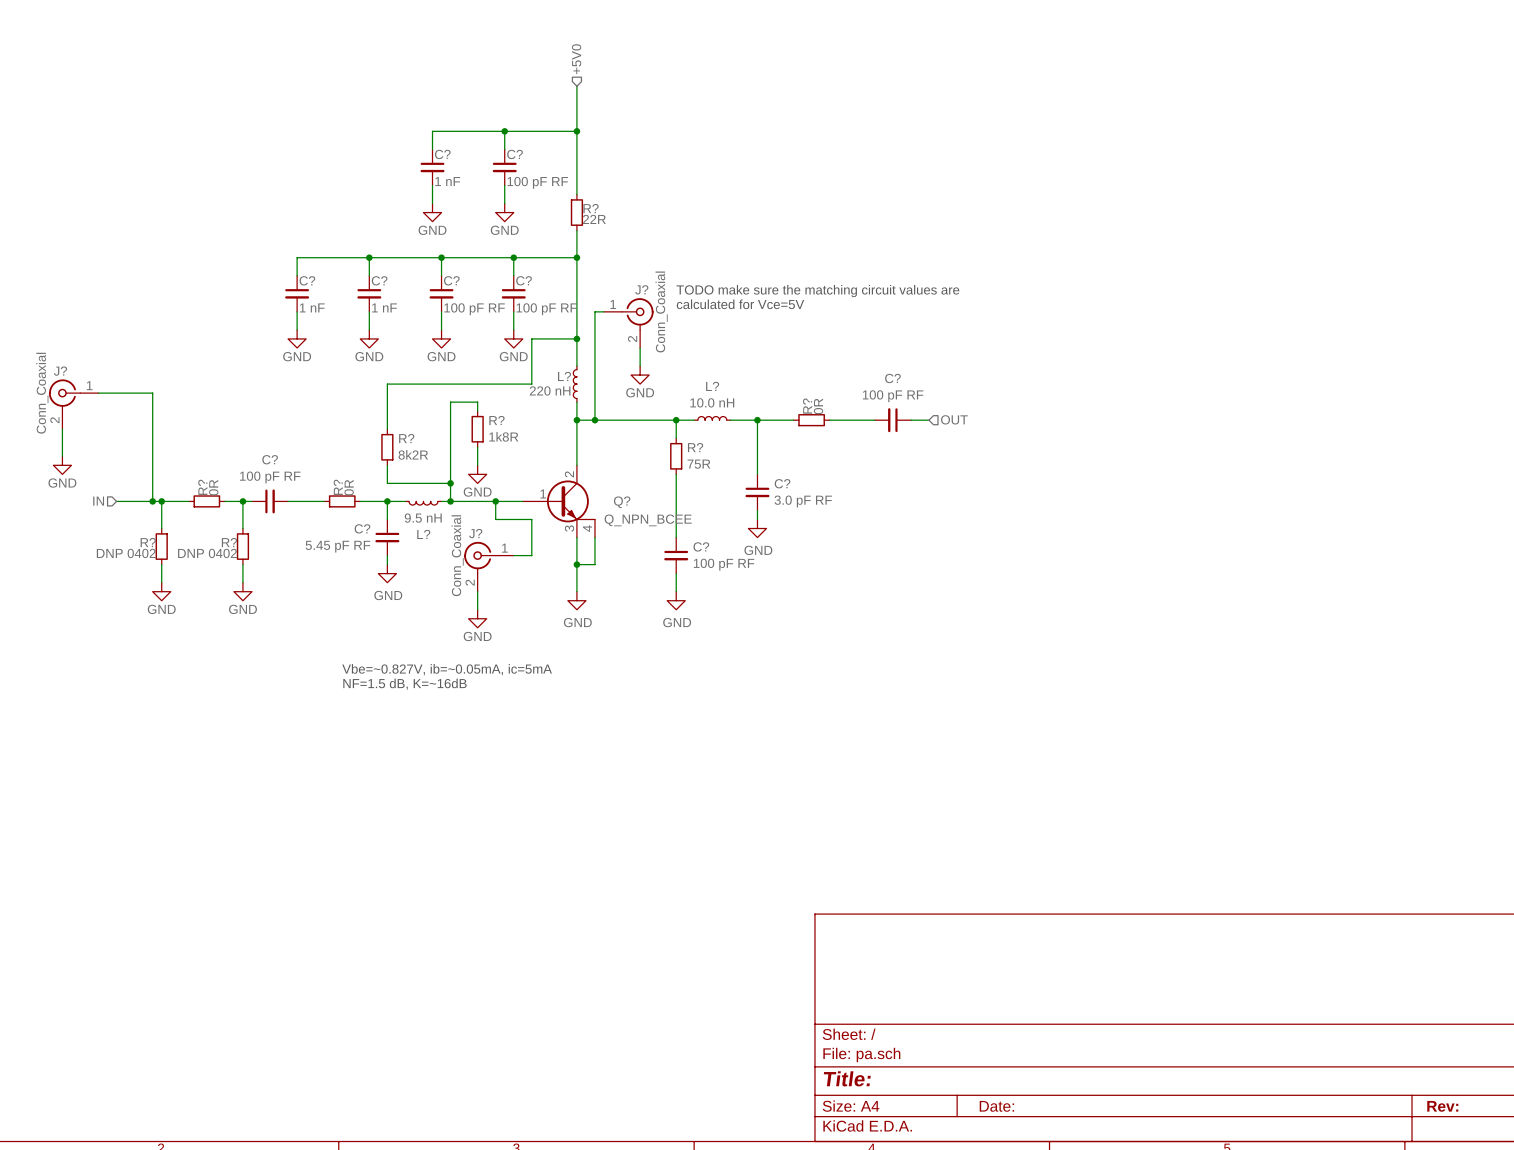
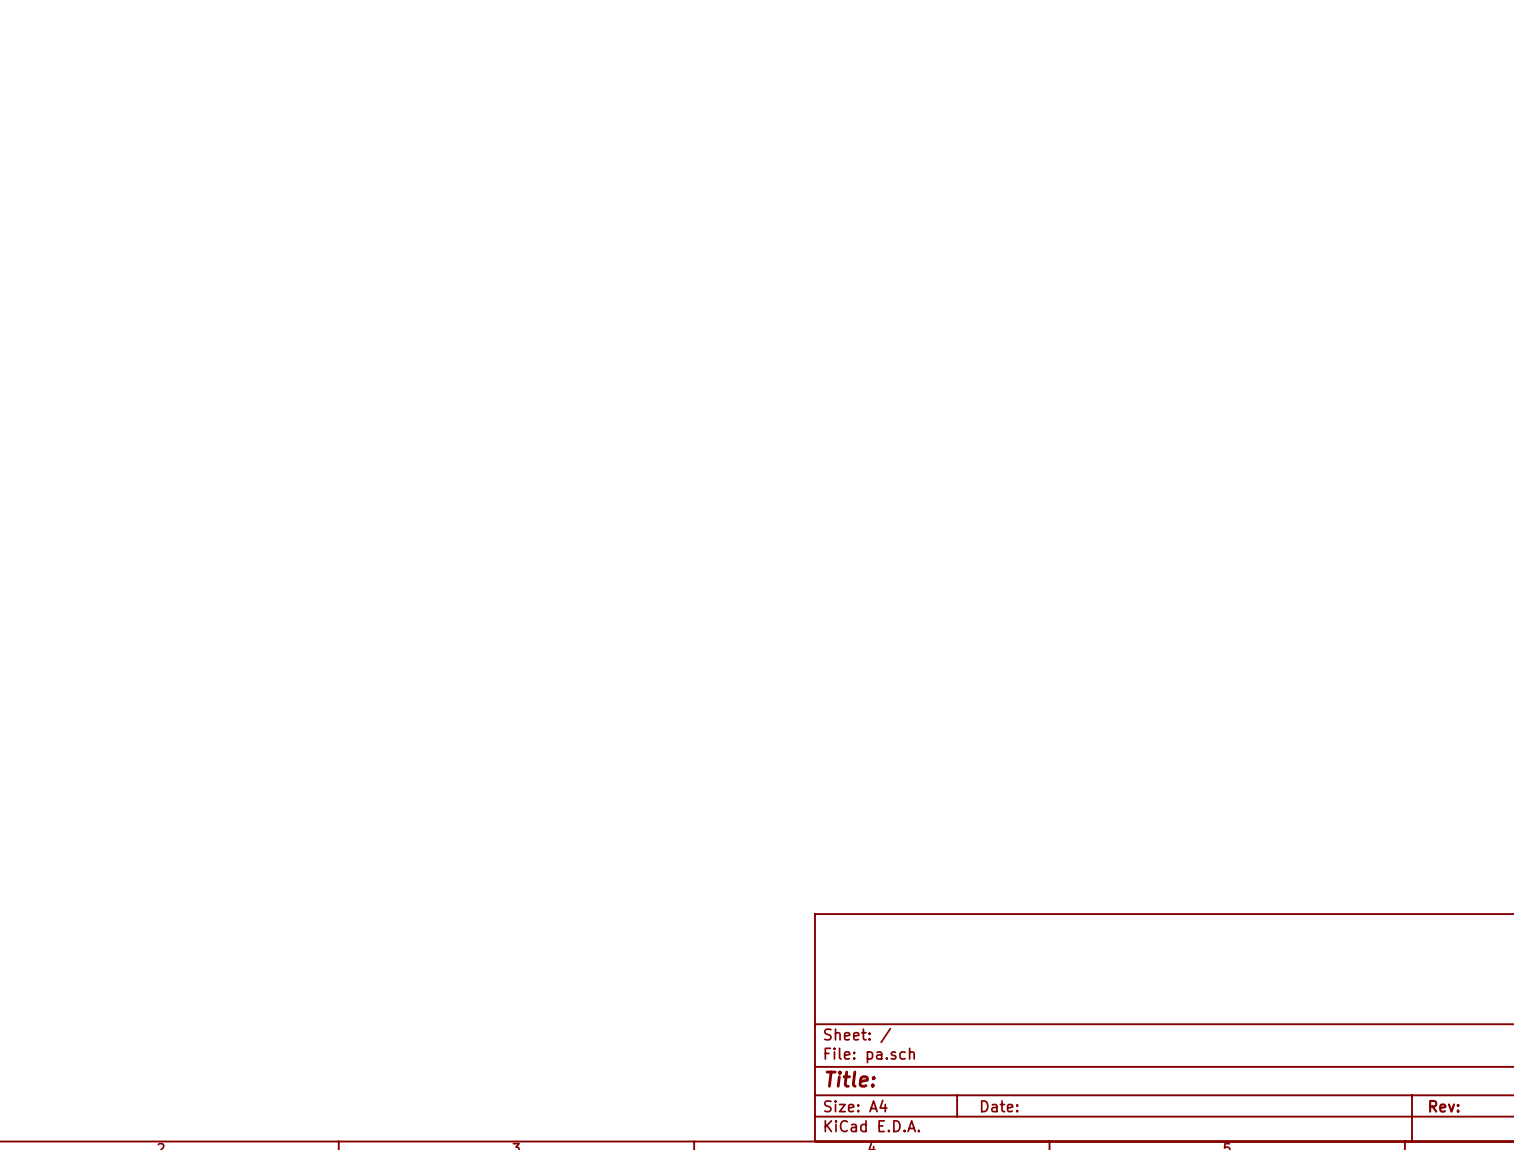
hierarchical label: +5V0 (576, 59) -> none
wire: (576, 86) (576, 194) -> none
wire: (504, 131) (504, 149) -> none
junction: (504, 131) -> none
wire: (576, 131) (432, 131) (432, 149) -> none
junction: (576, 131) -> none
C?: 1 nF (432, 167) -> none
C?: 100 pF RF (504, 167) -> none
wire: (432, 185) (432, 203) -> none
wire: (504, 185) (504, 203) -> none
power symbol: GND (432, 212) -> none
power symbol: GND (504, 212) -> none
R?: 22R (576, 212) -> none
wire: (576, 230) (576, 366) -> none
wire: (369, 257) (369, 275) -> none
junction: (369, 257) -> none
wire: (441, 257) (441, 275) -> none
junction: (441, 257) -> none
wire: (513, 257) (513, 275) -> none
junction: (513, 257) -> none
wire: (576, 257) (297, 257) (297, 275) -> none
junction: (576, 257) -> none
text: TODO make sure the matching circuit values are (817, 291) -> none
C?: 1 nF (297, 293) -> none
C?: 1 nF (369, 293) -> none
C?: 100 pF RF (441, 293) -> none
C?: 100 pF RF (513, 293) -> none
text: calculated for Vce=5V (740, 304) -> none
wire: (297, 311) (297, 329) -> none
wire: (369, 311) (369, 329) -> none
wire: (441, 311) (441, 329) -> none
wire: (513, 311) (513, 329) -> none
wire: (604, 311) (594, 311) (594, 420) -> none
J?: Conn_Coaxial (628, 323) -> none
power symbol: GND (297, 338) -> none
power symbol: GND (369, 338) -> none
power symbol: GND (441, 338) -> none
power symbol: GND (513, 338) -> none
wire: (576, 338) (531, 338) (531, 384) (387, 384) (387, 429) -> none
junction: (576, 338) -> none
wire: (640, 347) (640, 366) -> none
power symbol: GND (640, 375) -> none
L?: 220 nH (575, 384) -> none
wire: (98, 393) (152, 393) (152, 501) -> none
wire: (576, 402) (576, 465) -> none
J?: Conn_Coaxial (73, 404) -> none
wire: (477, 411) (477, 402) (450, 402) (450, 501) -> none
L?: 10.0 nH (712, 418) -> none
hierarchical label: OUT (954, 419) -> none
wire: (576, 420) (694, 420) -> none
junction: (576, 420) -> none
junction: (594, 420) -> none
wire: (676, 420) (676, 438) -> none
junction: (676, 420) -> none
wire: (730, 420) (793, 420) -> none
wire: (757, 420) (757, 474) -> none
junction: (757, 420) -> none
R?: 0R (811, 420) -> none
wire: (829, 420) (874, 420) -> none
C?: 100 pF RF (892, 420) -> none
wire: (910, 420) (928, 420) -> none
wire: (62, 429) (62, 456) -> none
R?: 1k8R (477, 429) -> none
R?: 8k2R (387, 447) -> none
wire: (477, 447) (477, 465) -> none
R?: 75R (676, 456) -> none
power symbol: GND (62, 465) -> none
wire: (387, 465) (387, 483) (450, 483) -> none
power symbol: GND (477, 474) -> none
wire: (676, 474) (676, 537) -> none
junction: (450, 483) -> none
C?: 3.0 pF RF (757, 492) -> none
hierarchical label: IN (98, 501) -> none
wire: (116, 501) (188, 501) -> none
junction: (152, 501) -> none
wire: (161, 501) (161, 528) -> none
junction: (161, 501) -> none
R?: 0R (206, 501) -> none
wire: (224, 501) (251, 501) -> none
wire: (242, 501) (242, 528) -> none
junction: (242, 501) -> none
C?: 100 pF RF (270, 501) -> none
wire: (288, 501) (324, 501) -> none
R?: 0R (342, 501) -> none
wire: (360, 501) (405, 501) -> none
wire: (387, 501) (387, 519) -> none
junction: (387, 501) -> none
wire: (441, 501) (522, 501) -> none
junction: (450, 501) -> none
wire: (495, 501) (495, 519) (531, 519) (531, 555) (513, 555) -> none
junction: (495, 501) -> none
Q?: Q_NPN_BCEE (558, 501) -> none
L?: 9.5 nH (423, 503) -> none
wire: (757, 510) (757, 519) -> none
power symbol: GND (757, 528) -> none
C?: 5.45 pF RF (387, 537) -> none
wire: (576, 537) (576, 591) -> none
wire: (594, 537) (594, 564) (576, 564) -> none
R?: DNP 0402 (161, 546) -> none
R?: DNP 0402 (242, 546) -> none
wire: (387, 555) (387, 564) -> none
C?: 100 pF RF (676, 555) -> none
wire: (161, 564) (161, 582) -> none
wire: (242, 564) (242, 582) -> none
junction: (576, 564) -> none
J?: Conn_Coaxial (488, 566) -> none
power symbol: GND (387, 573) -> none
wire: (676, 573) (676, 591) -> none
power symbol: GND (161, 591) -> none
power symbol: GND (242, 591) -> none
wire: (477, 591) (477, 609) -> none
power symbol: GND (576, 600) -> none
power symbol: GND (676, 600) -> none
power symbol: GND (477, 618) -> none
text: Vbe=~0.827V, ib=~0.05mA, ic=5mA (447, 669) -> none
text: NF=1.5 dB, K=~16dB (404, 684) -> none

